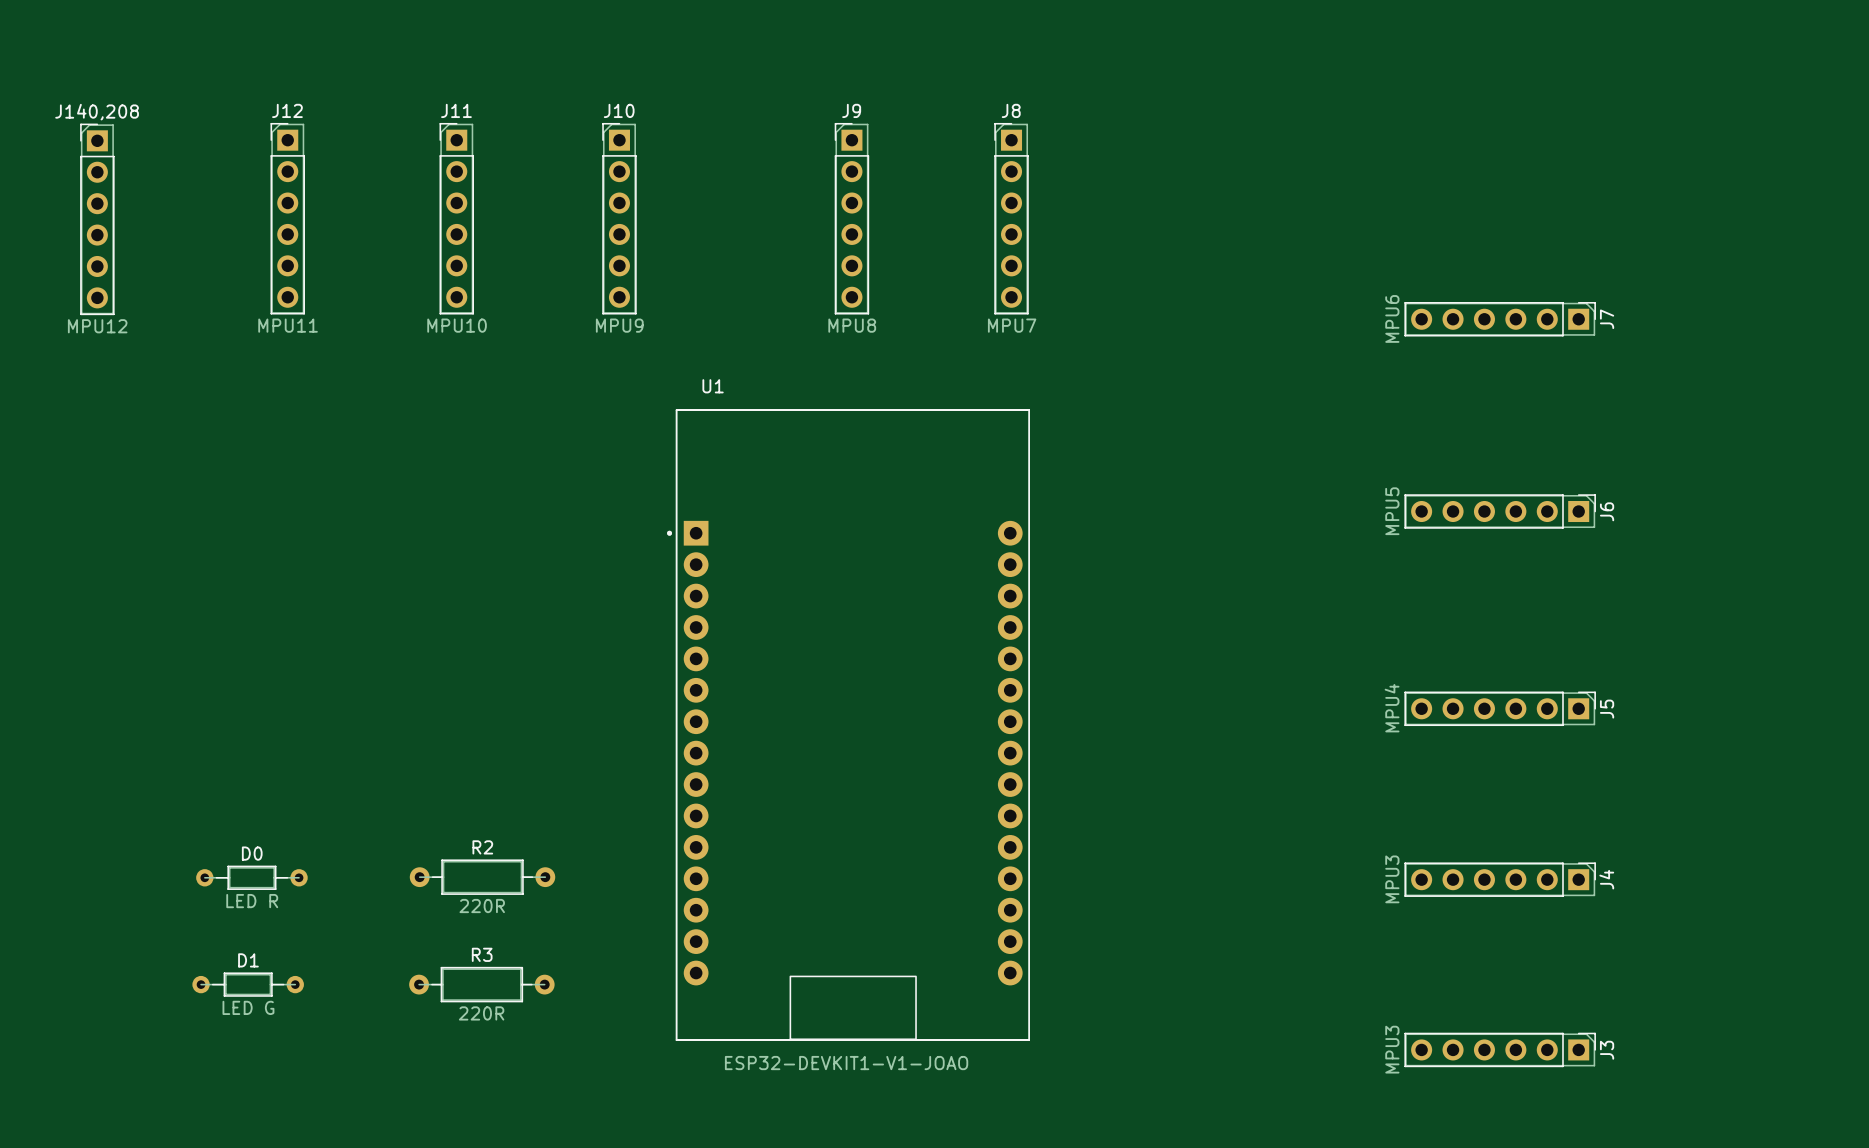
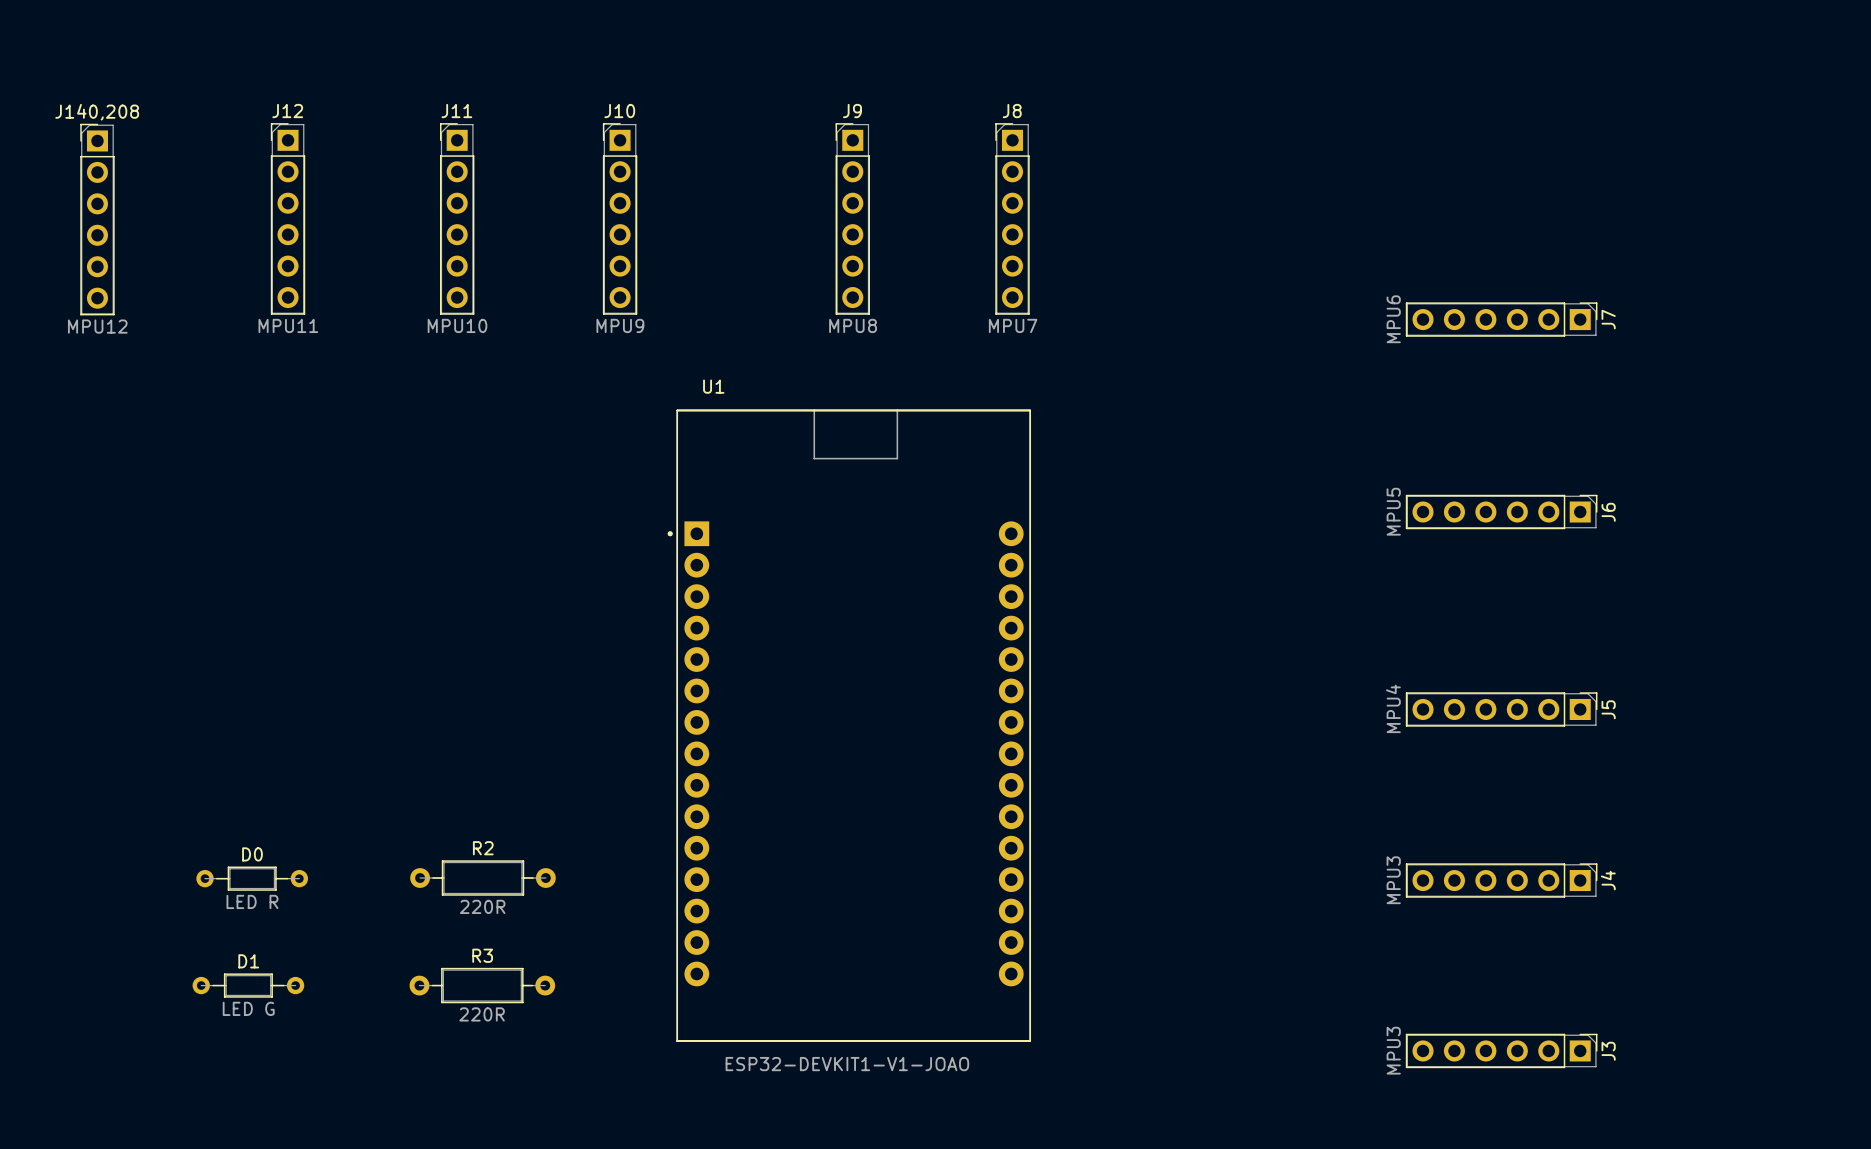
U1 footprint: [667, 409, 1030, 1041] -> [667, 409, 1031, 1042]

